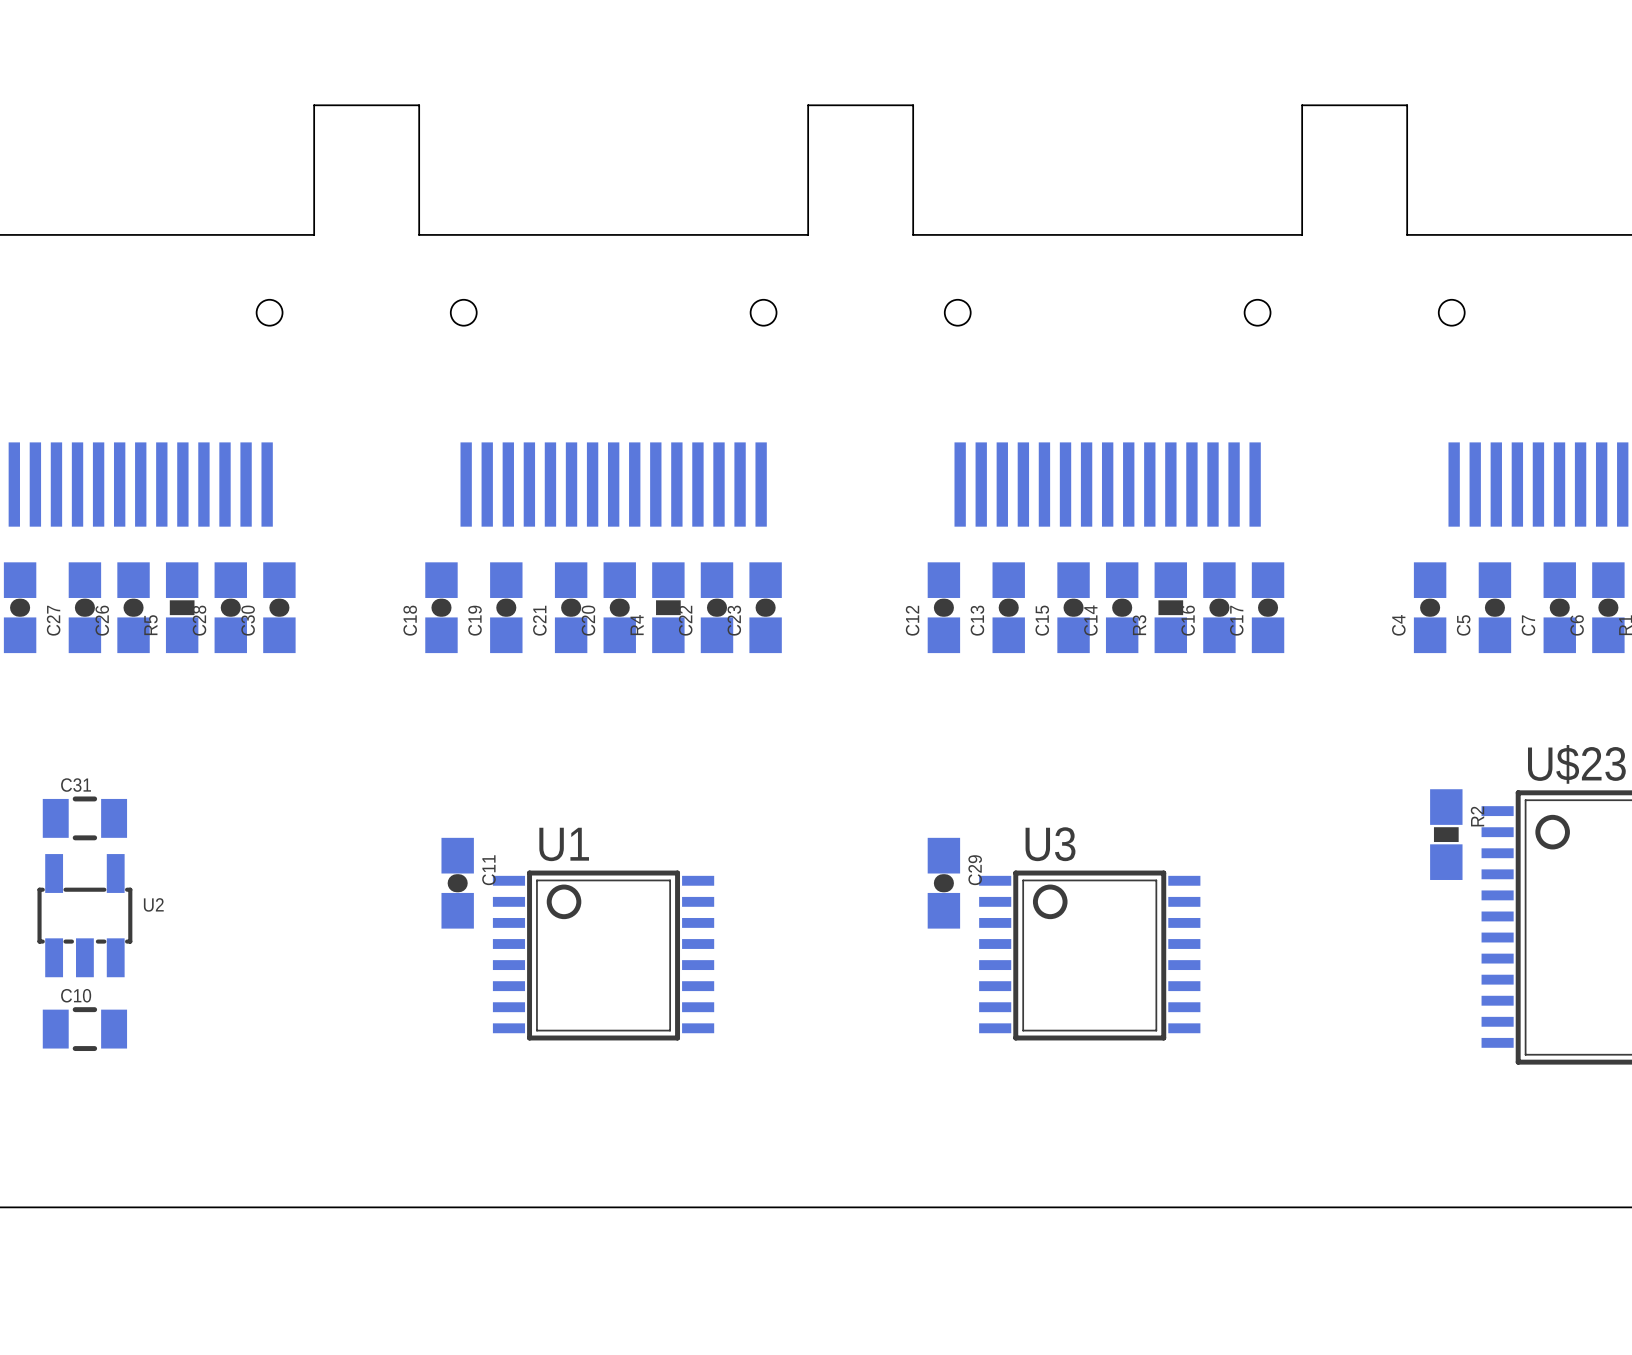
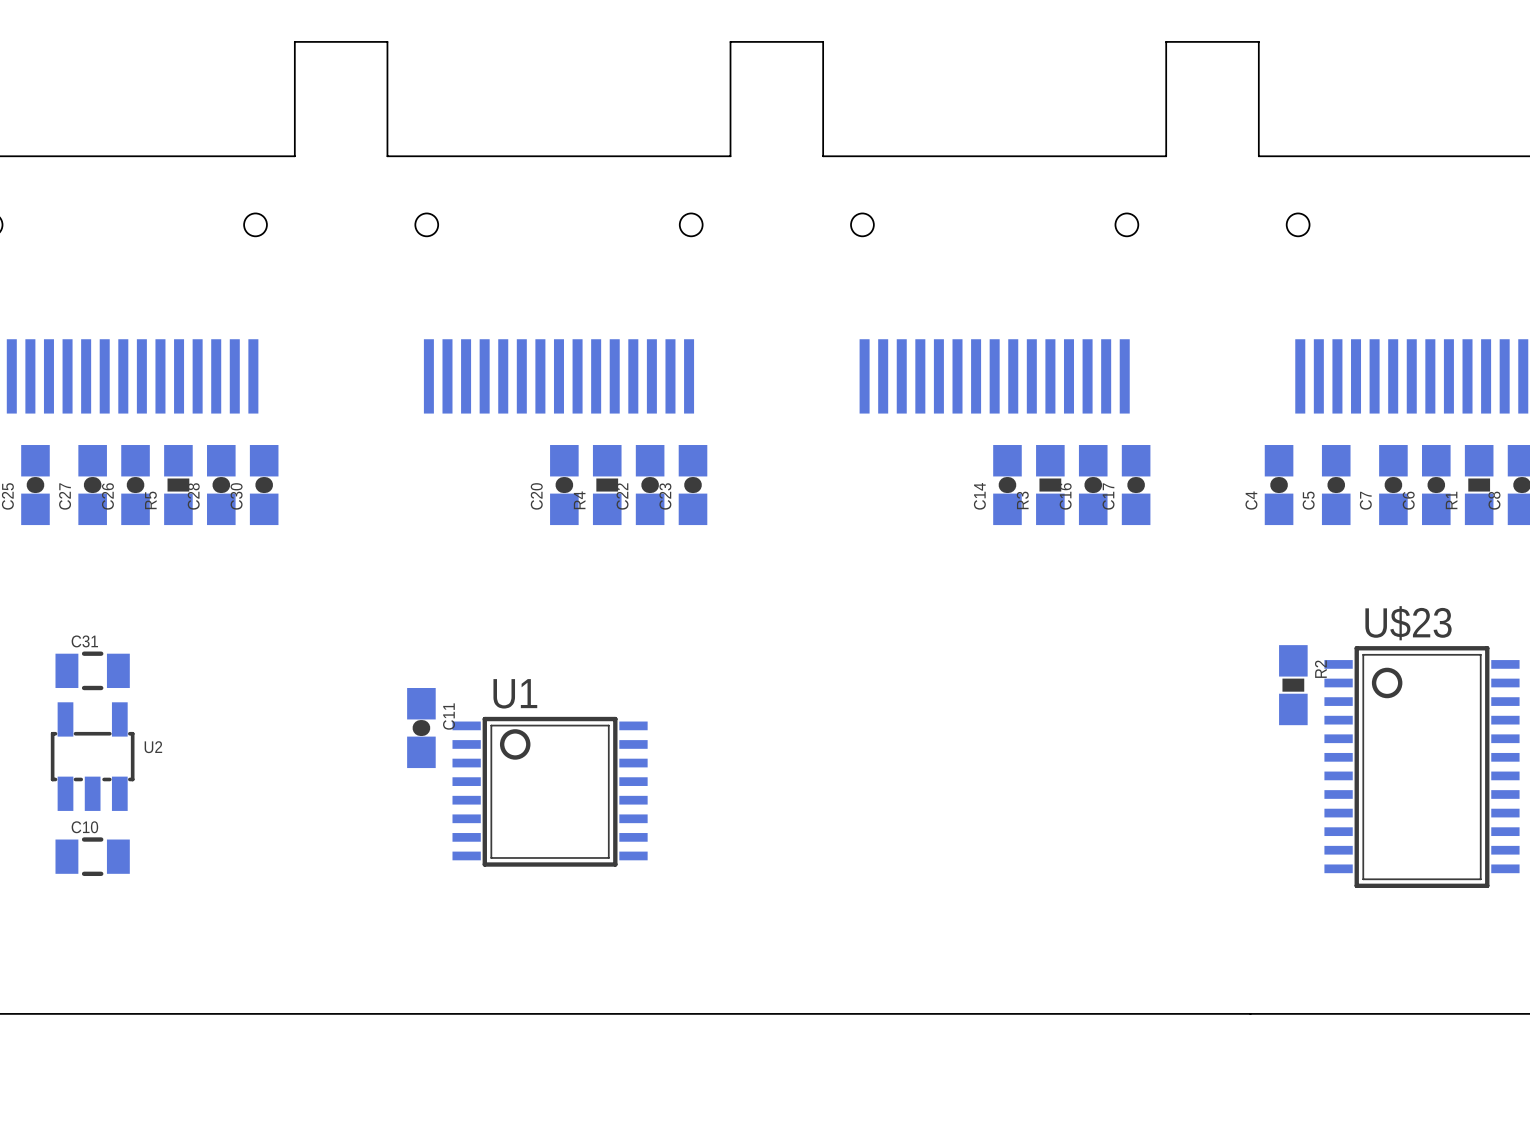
C18: (441, 607) -> none
C19: (506, 607) -> none
C21: (571, 607) -> none
C12: (943, 607) -> none
C13: (1008, 607) -> none
C15: (1073, 607) -> none
C29: (943, 883) -> none
U3: (1089, 955) -> none

